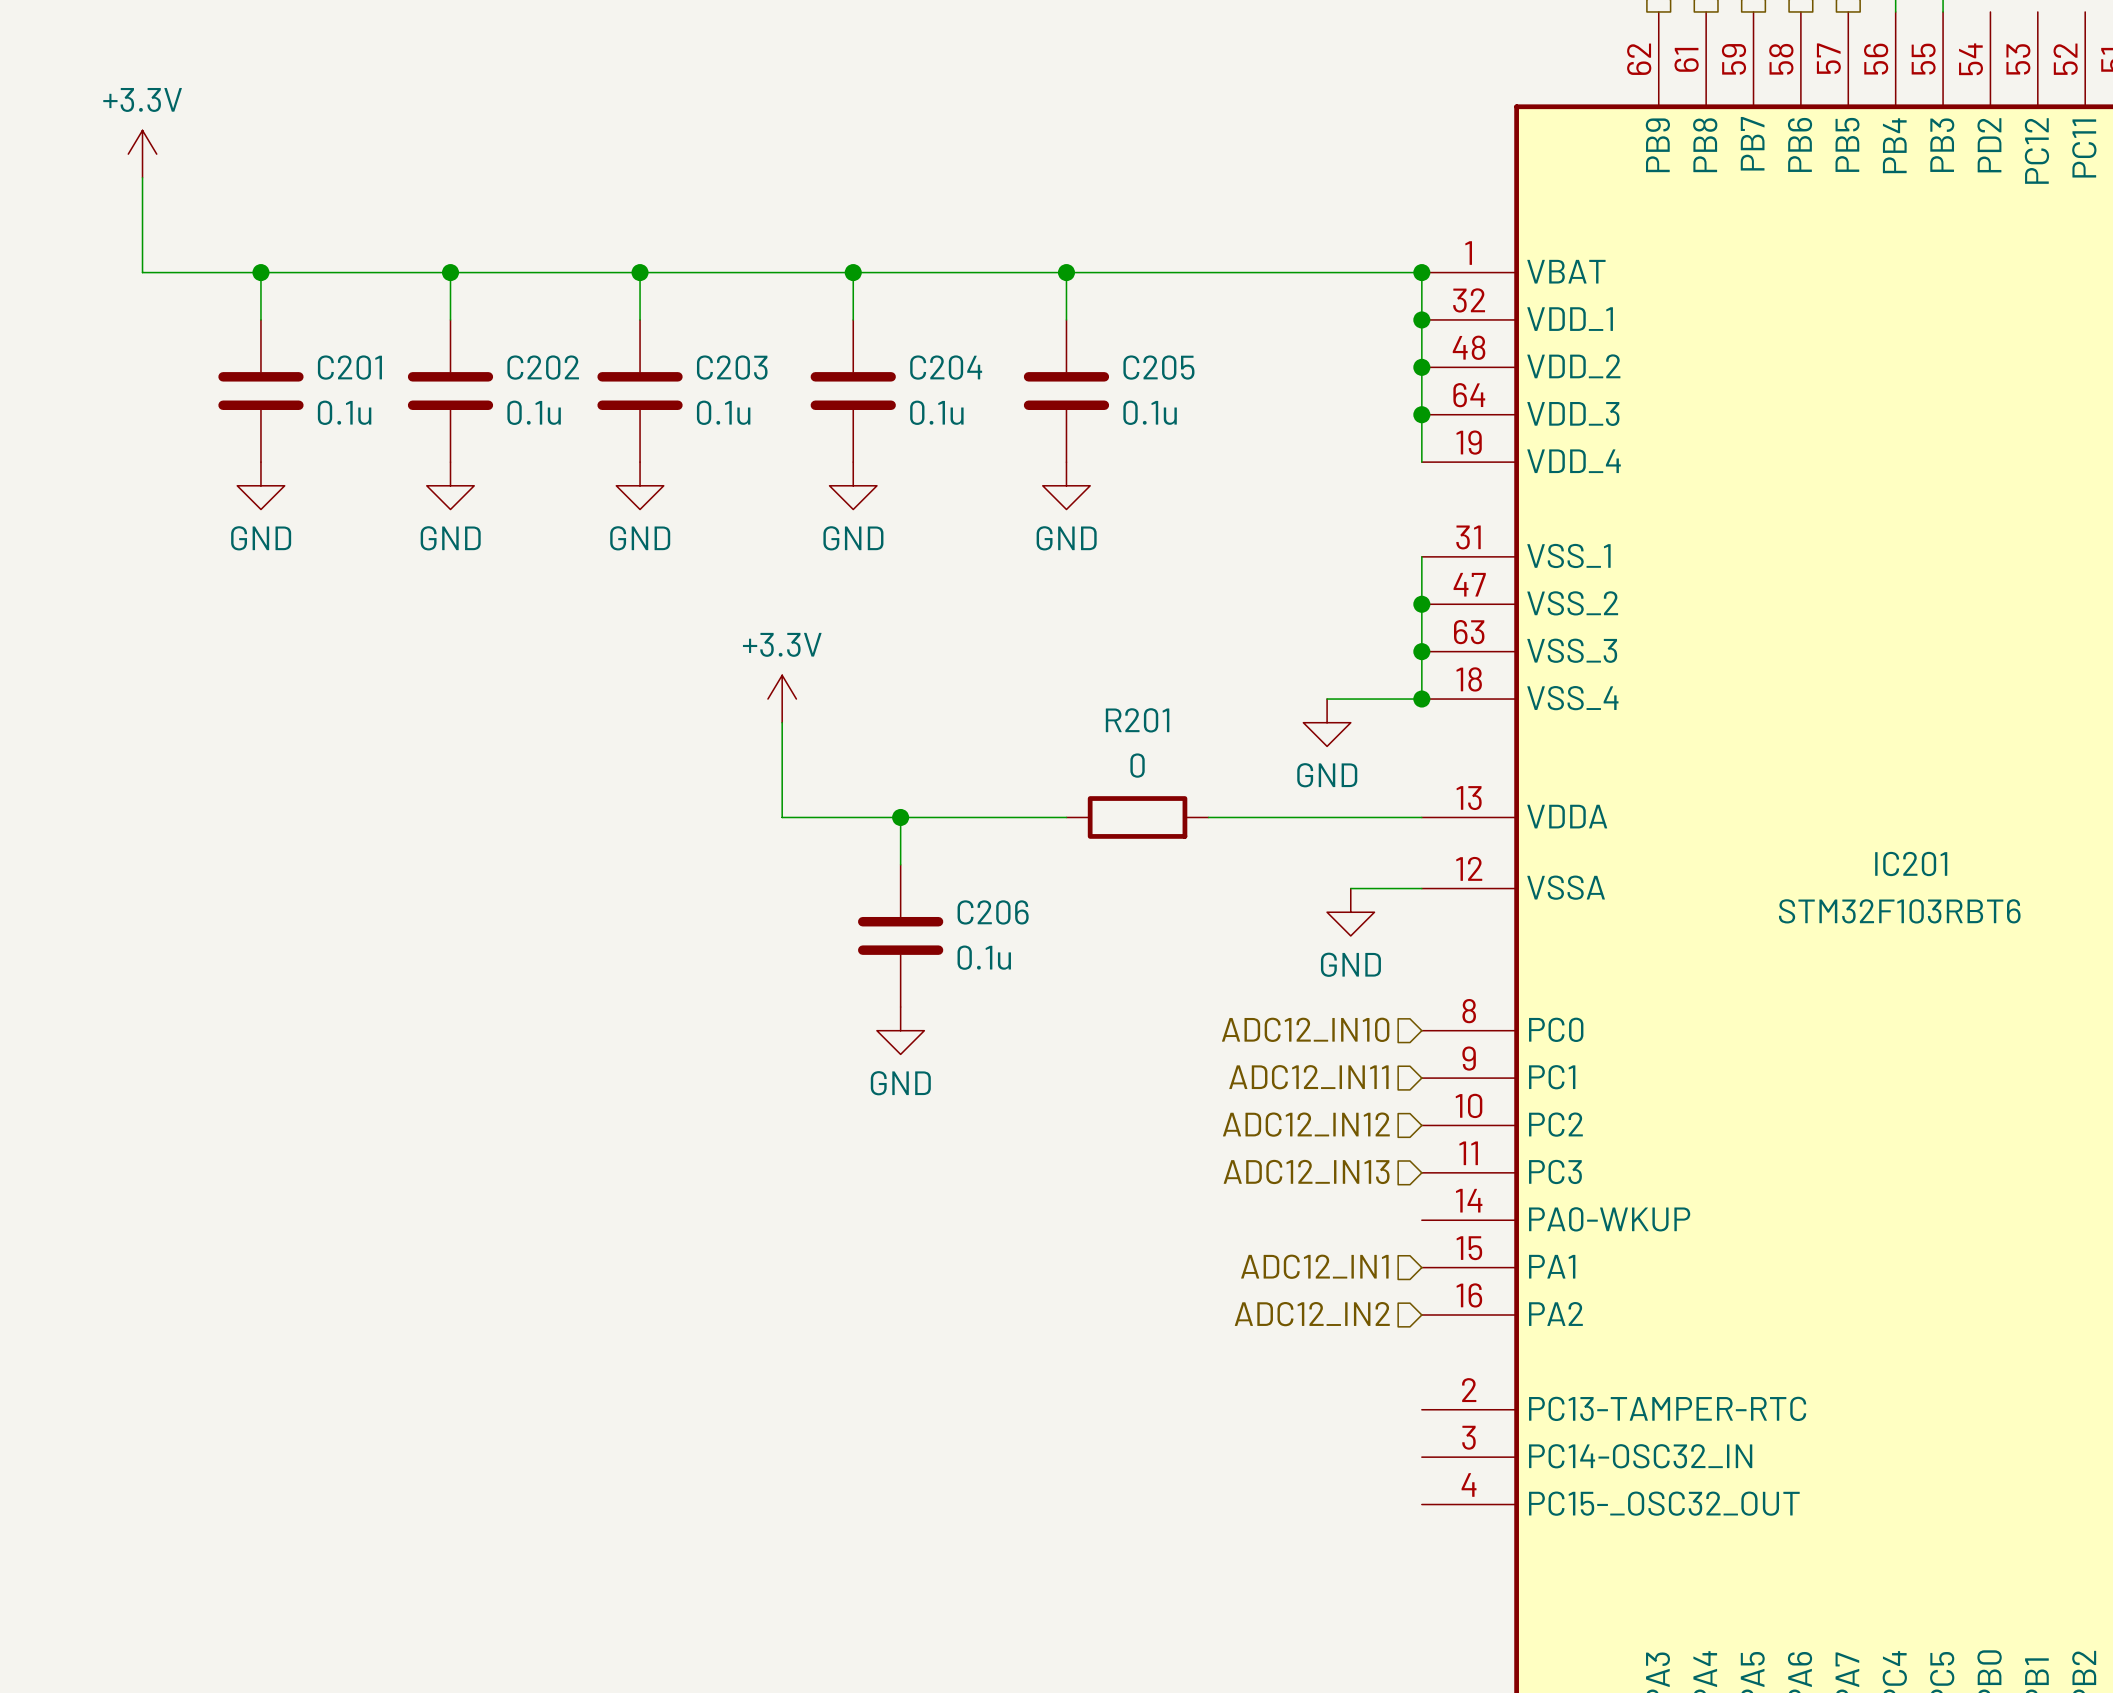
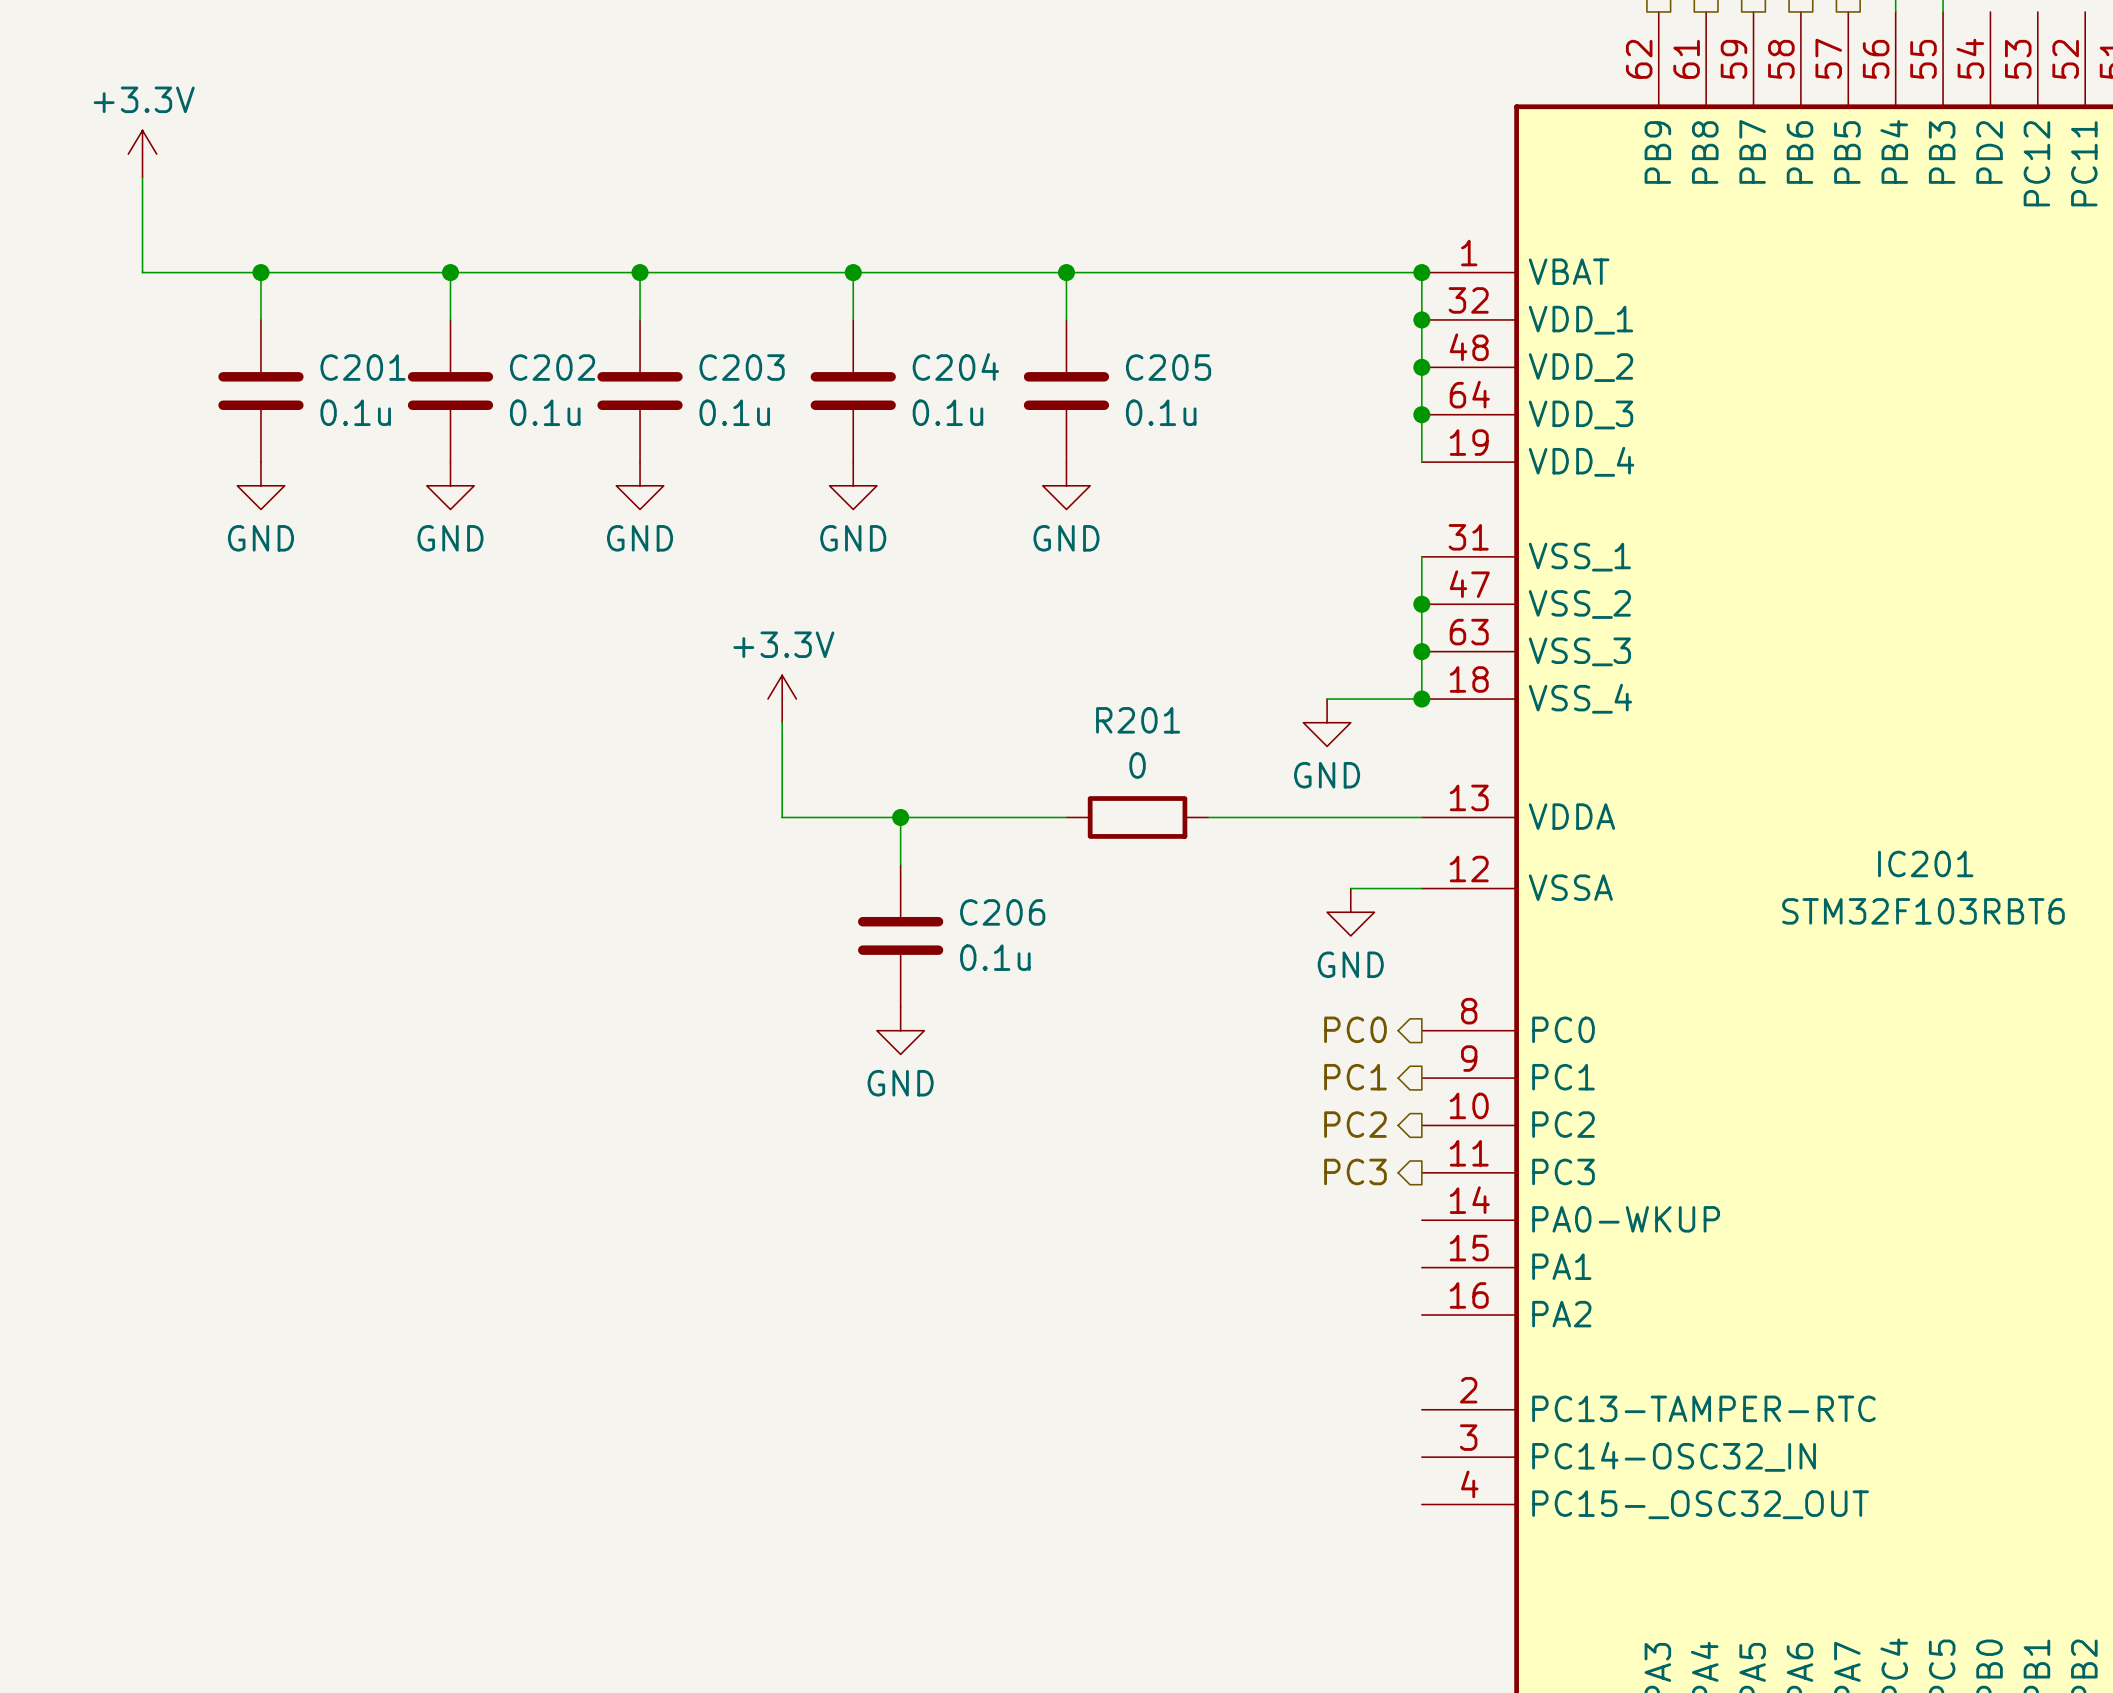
hierarchical label shape: input (1305, 1029) -> output (1355, 1029)
hierarchical label: ADC12_IN10 (1305, 1029) -> PC0 (1355, 1029)
hierarchical label shape: input (1308, 1077) -> output (1355, 1077)
hierarchical label: ADC12_IN11 (1308, 1077) -> PC1 (1355, 1077)
hierarchical label shape: input (1306, 1124) -> output (1355, 1124)
hierarchical label: ADC12_IN12 (1306, 1124) -> PC2 (1355, 1124)
hierarchical label shape: input (1306, 1171) -> output (1355, 1171)
hierarchical label: ADC12_IN13 (1306, 1171) -> PC3 (1355, 1171)
hierarchical label: ADC12_IN1 (1314, 1266) -> none
hierarchical label: ADC12_IN2 (1312, 1314) -> none

